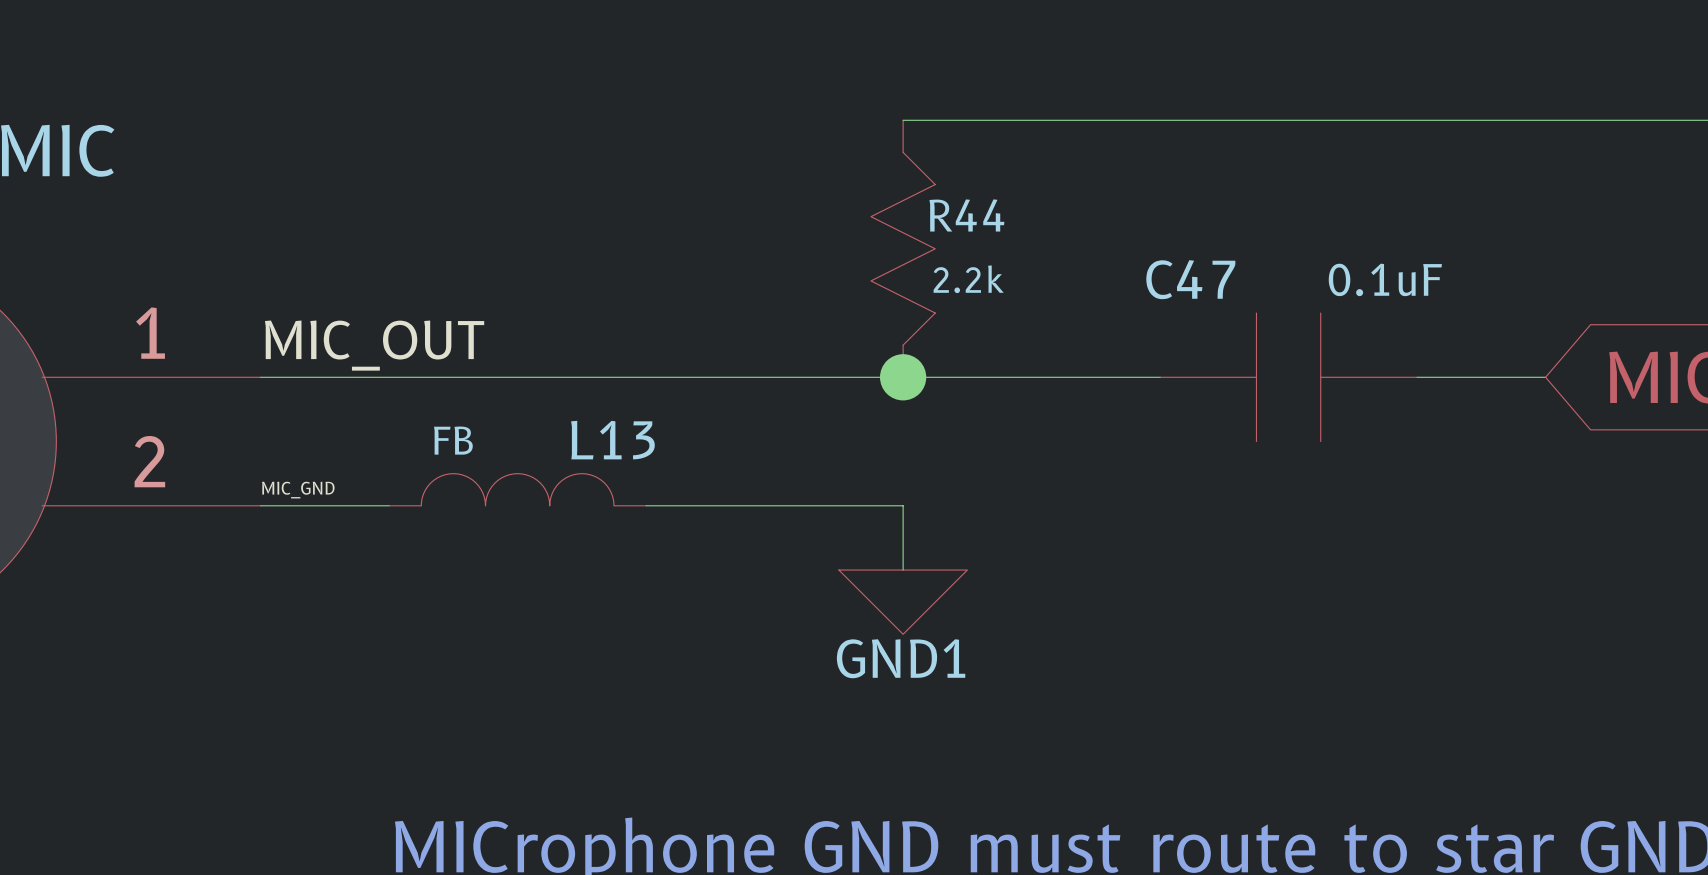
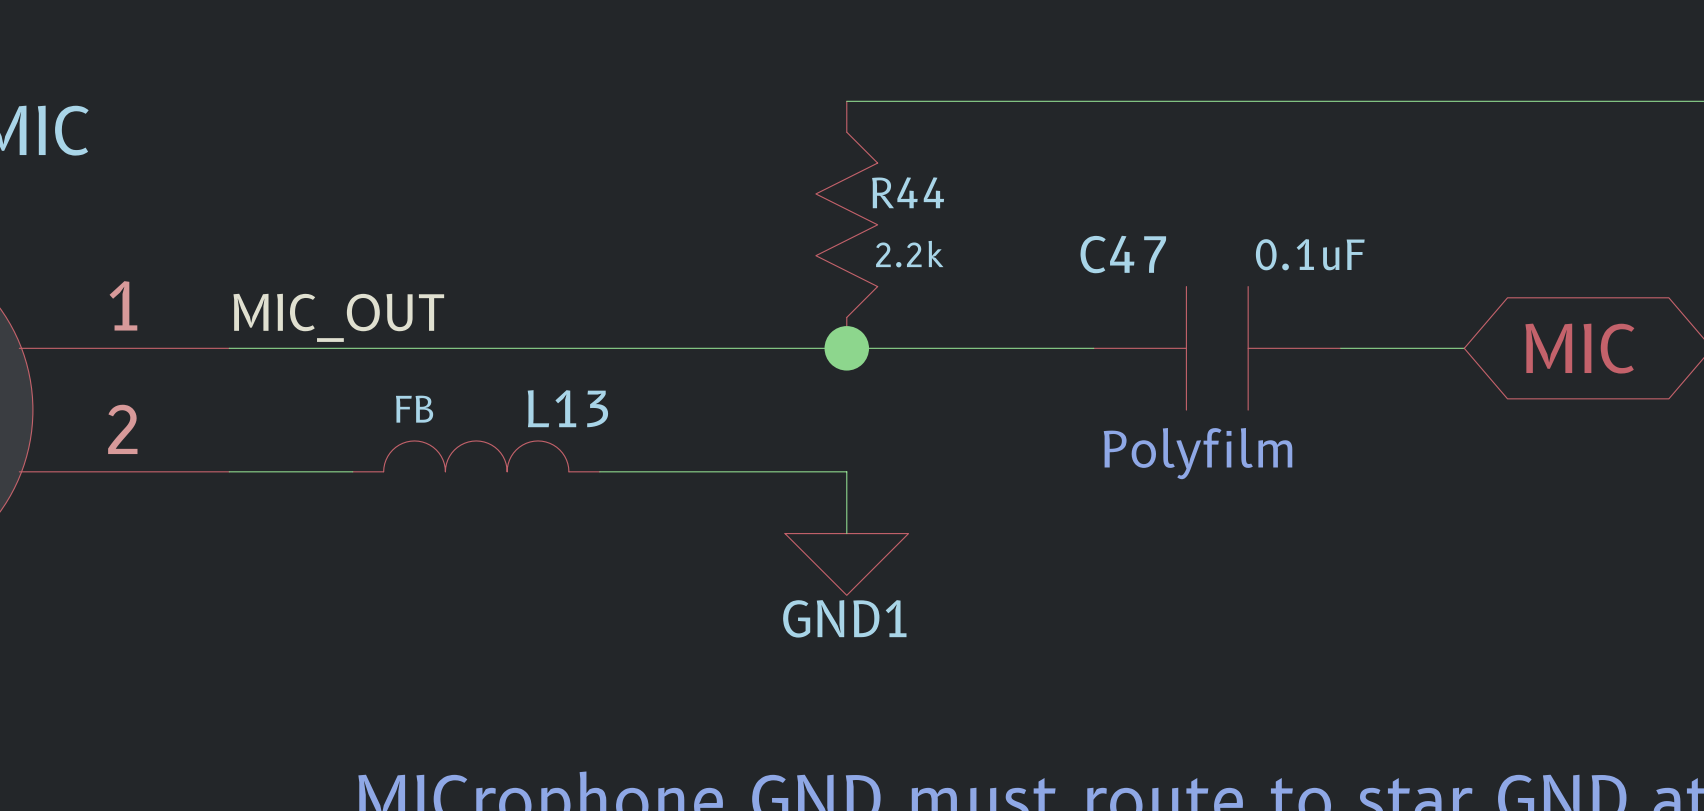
text: none -> Polyfilm (1198, 453)
label: MIC_GND (298, 490) -> none

